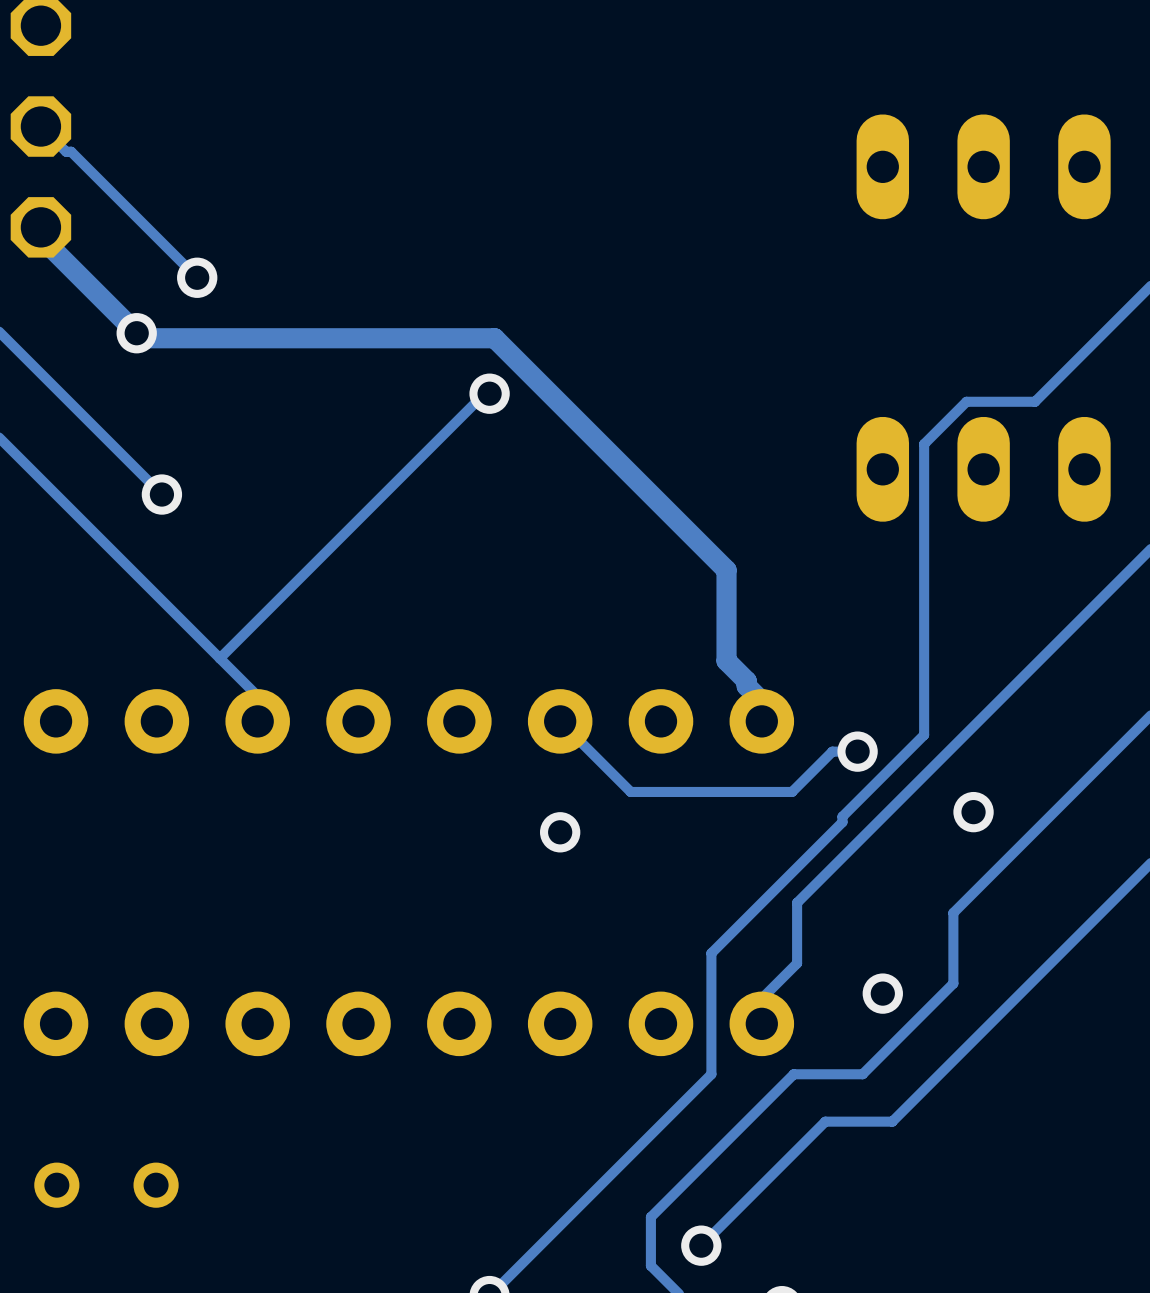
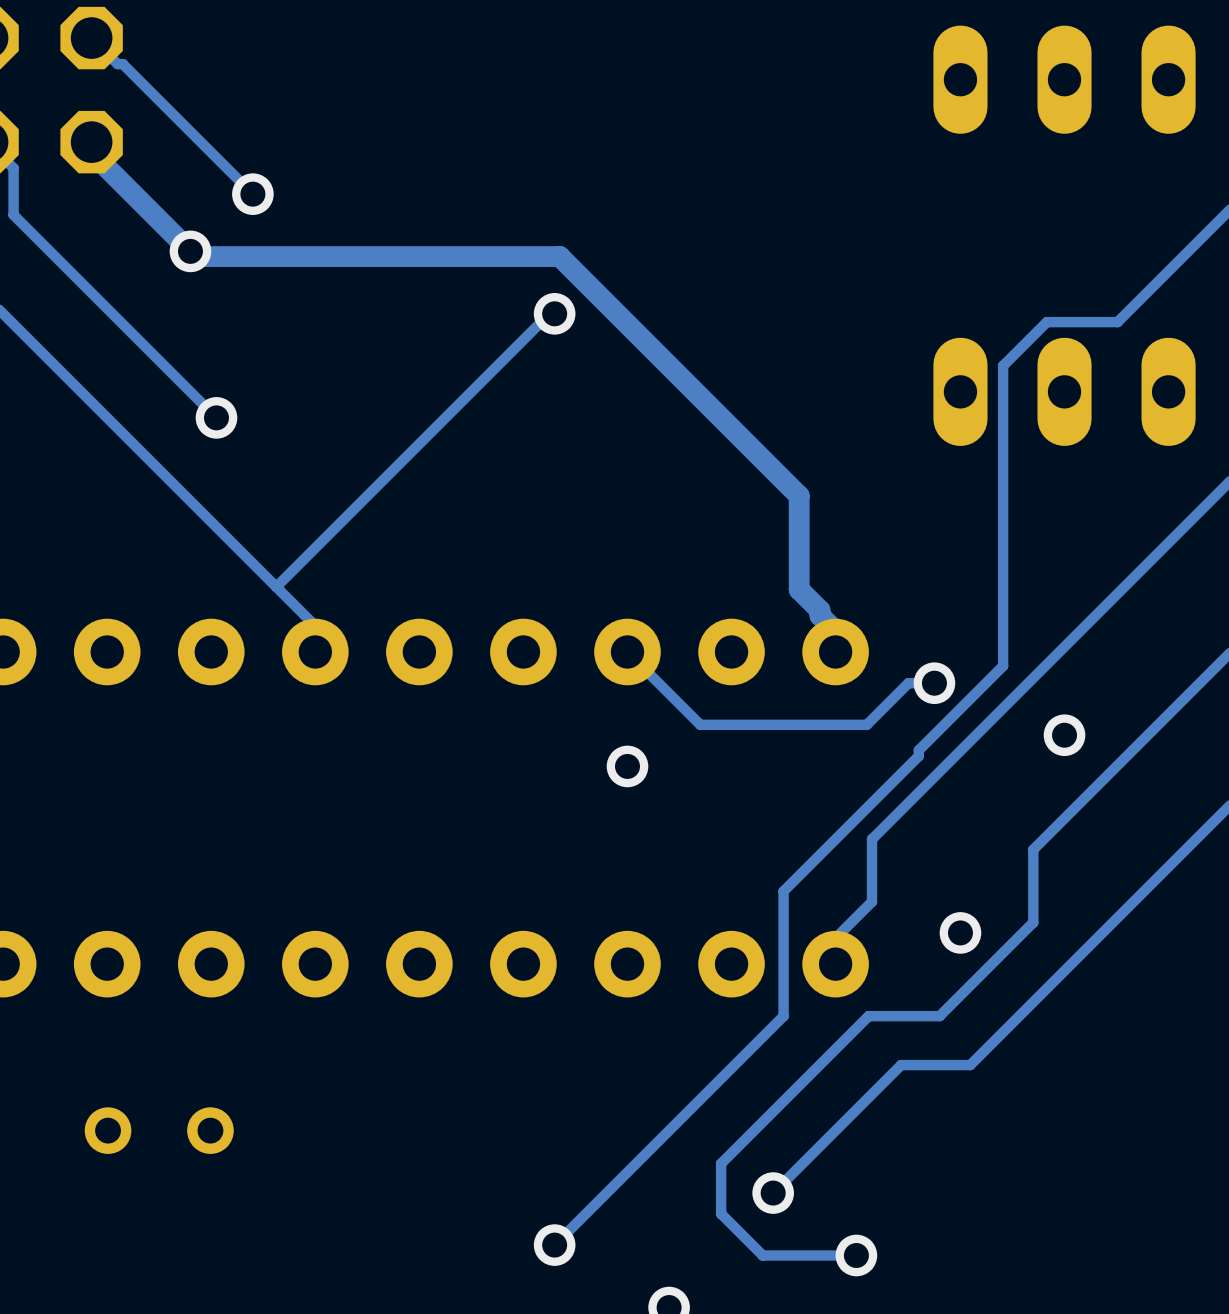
via position: (973, 812) -> (1064, 735)

